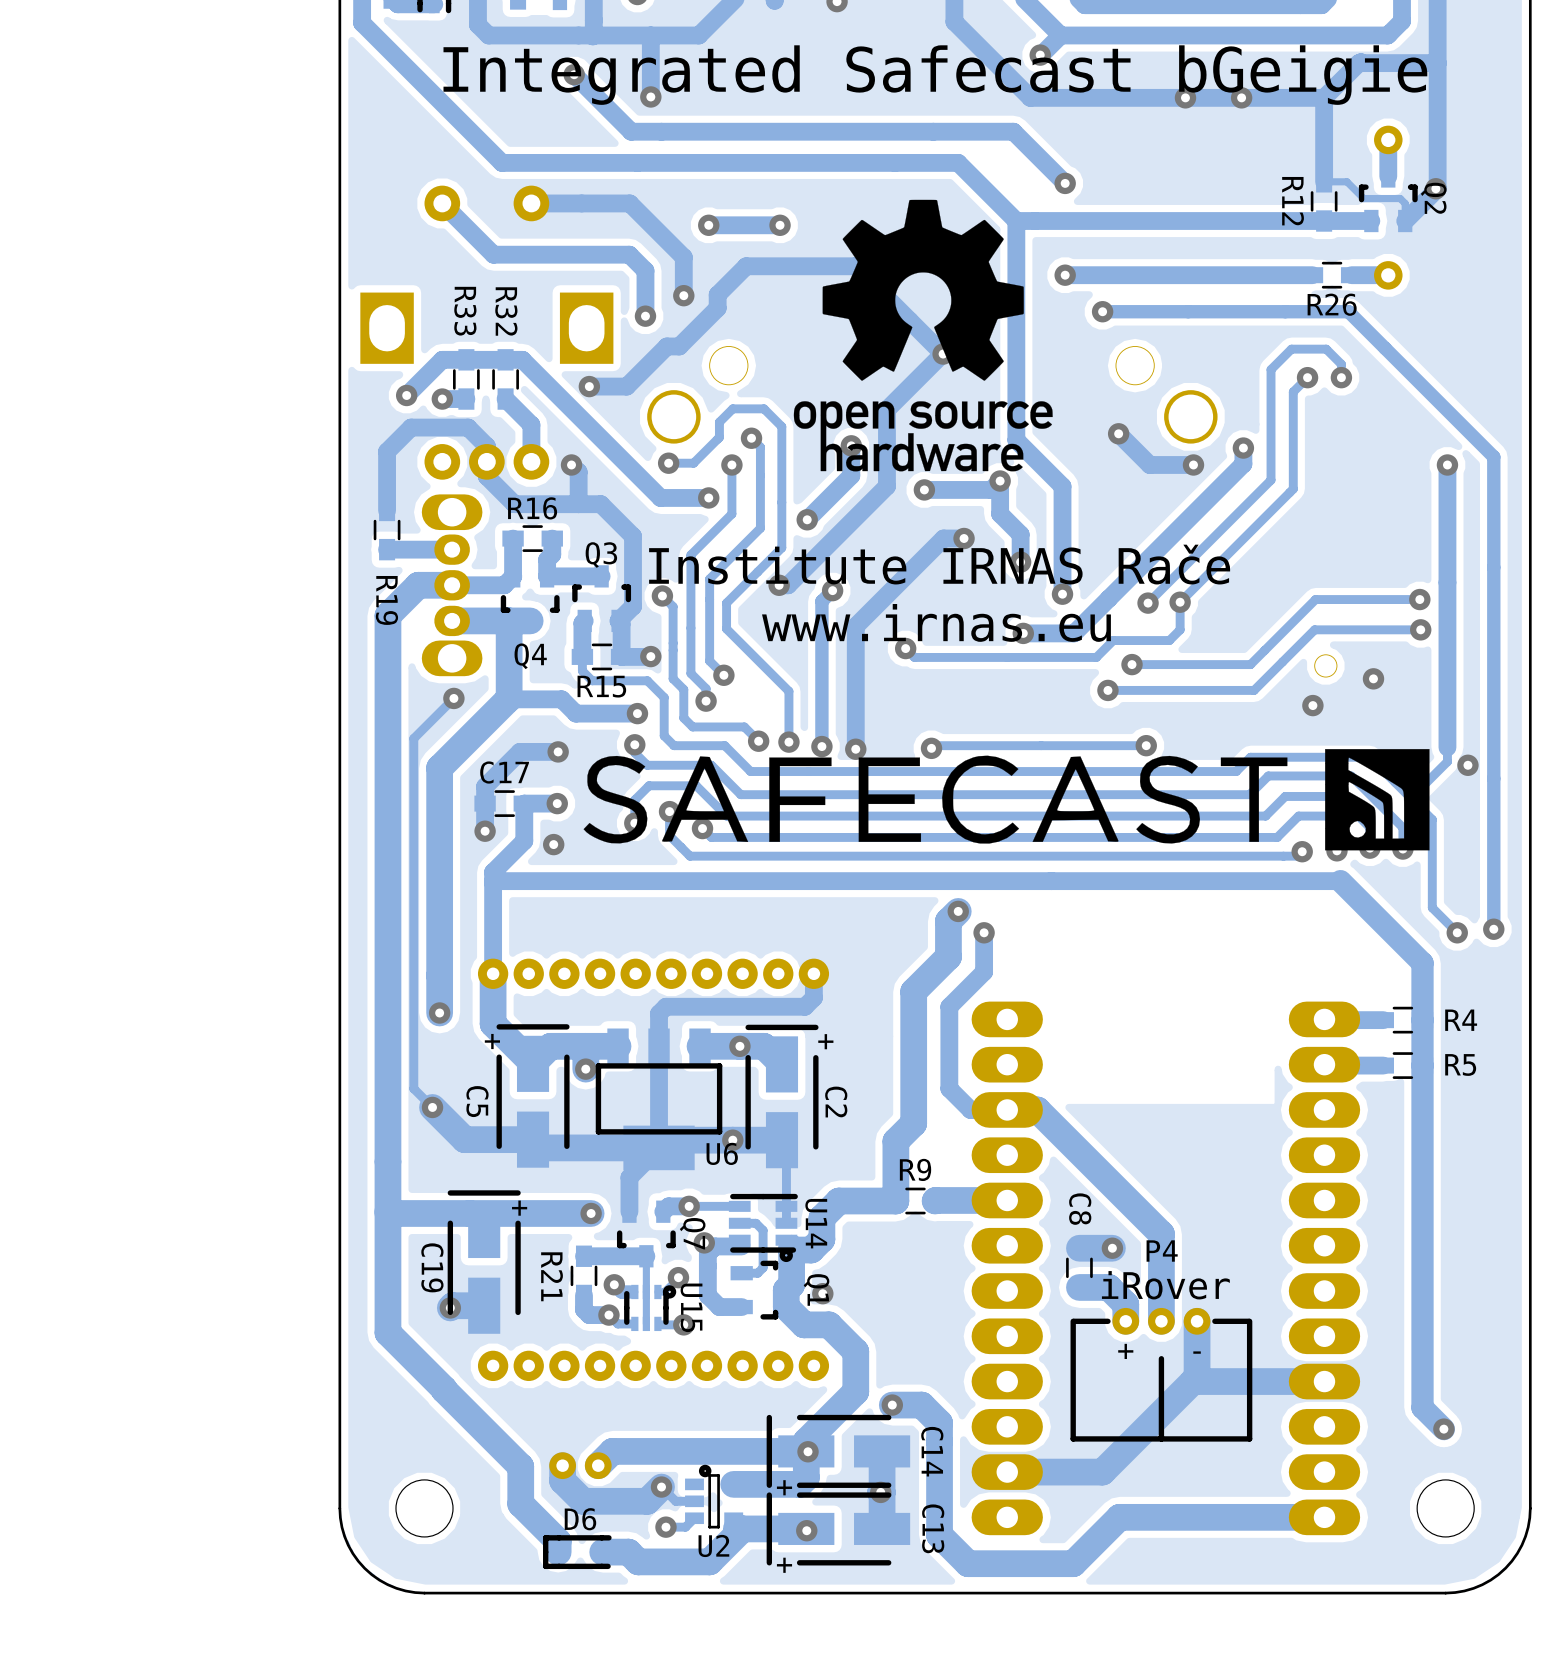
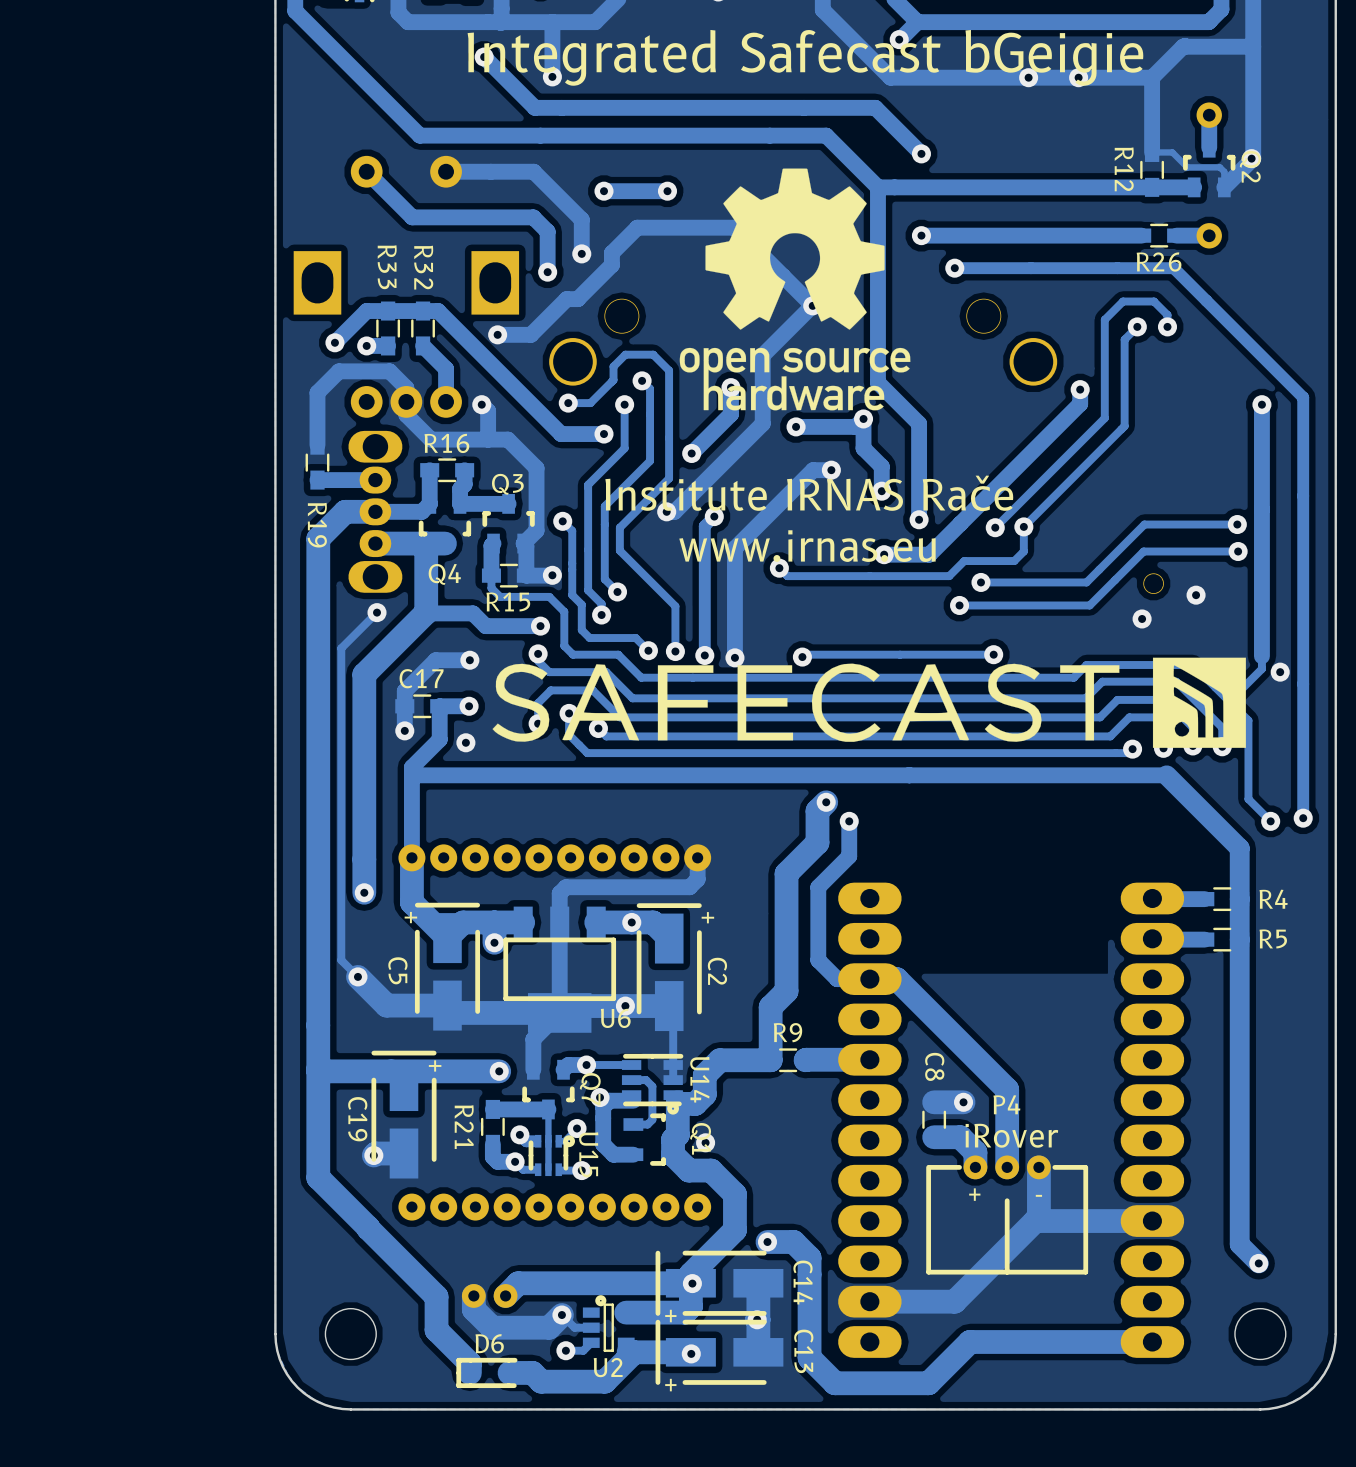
track: (1118, 433) (1149, 464) (1193, 464) -> none
via: (1118, 433) -> none
via: (1193, 464) -> none

